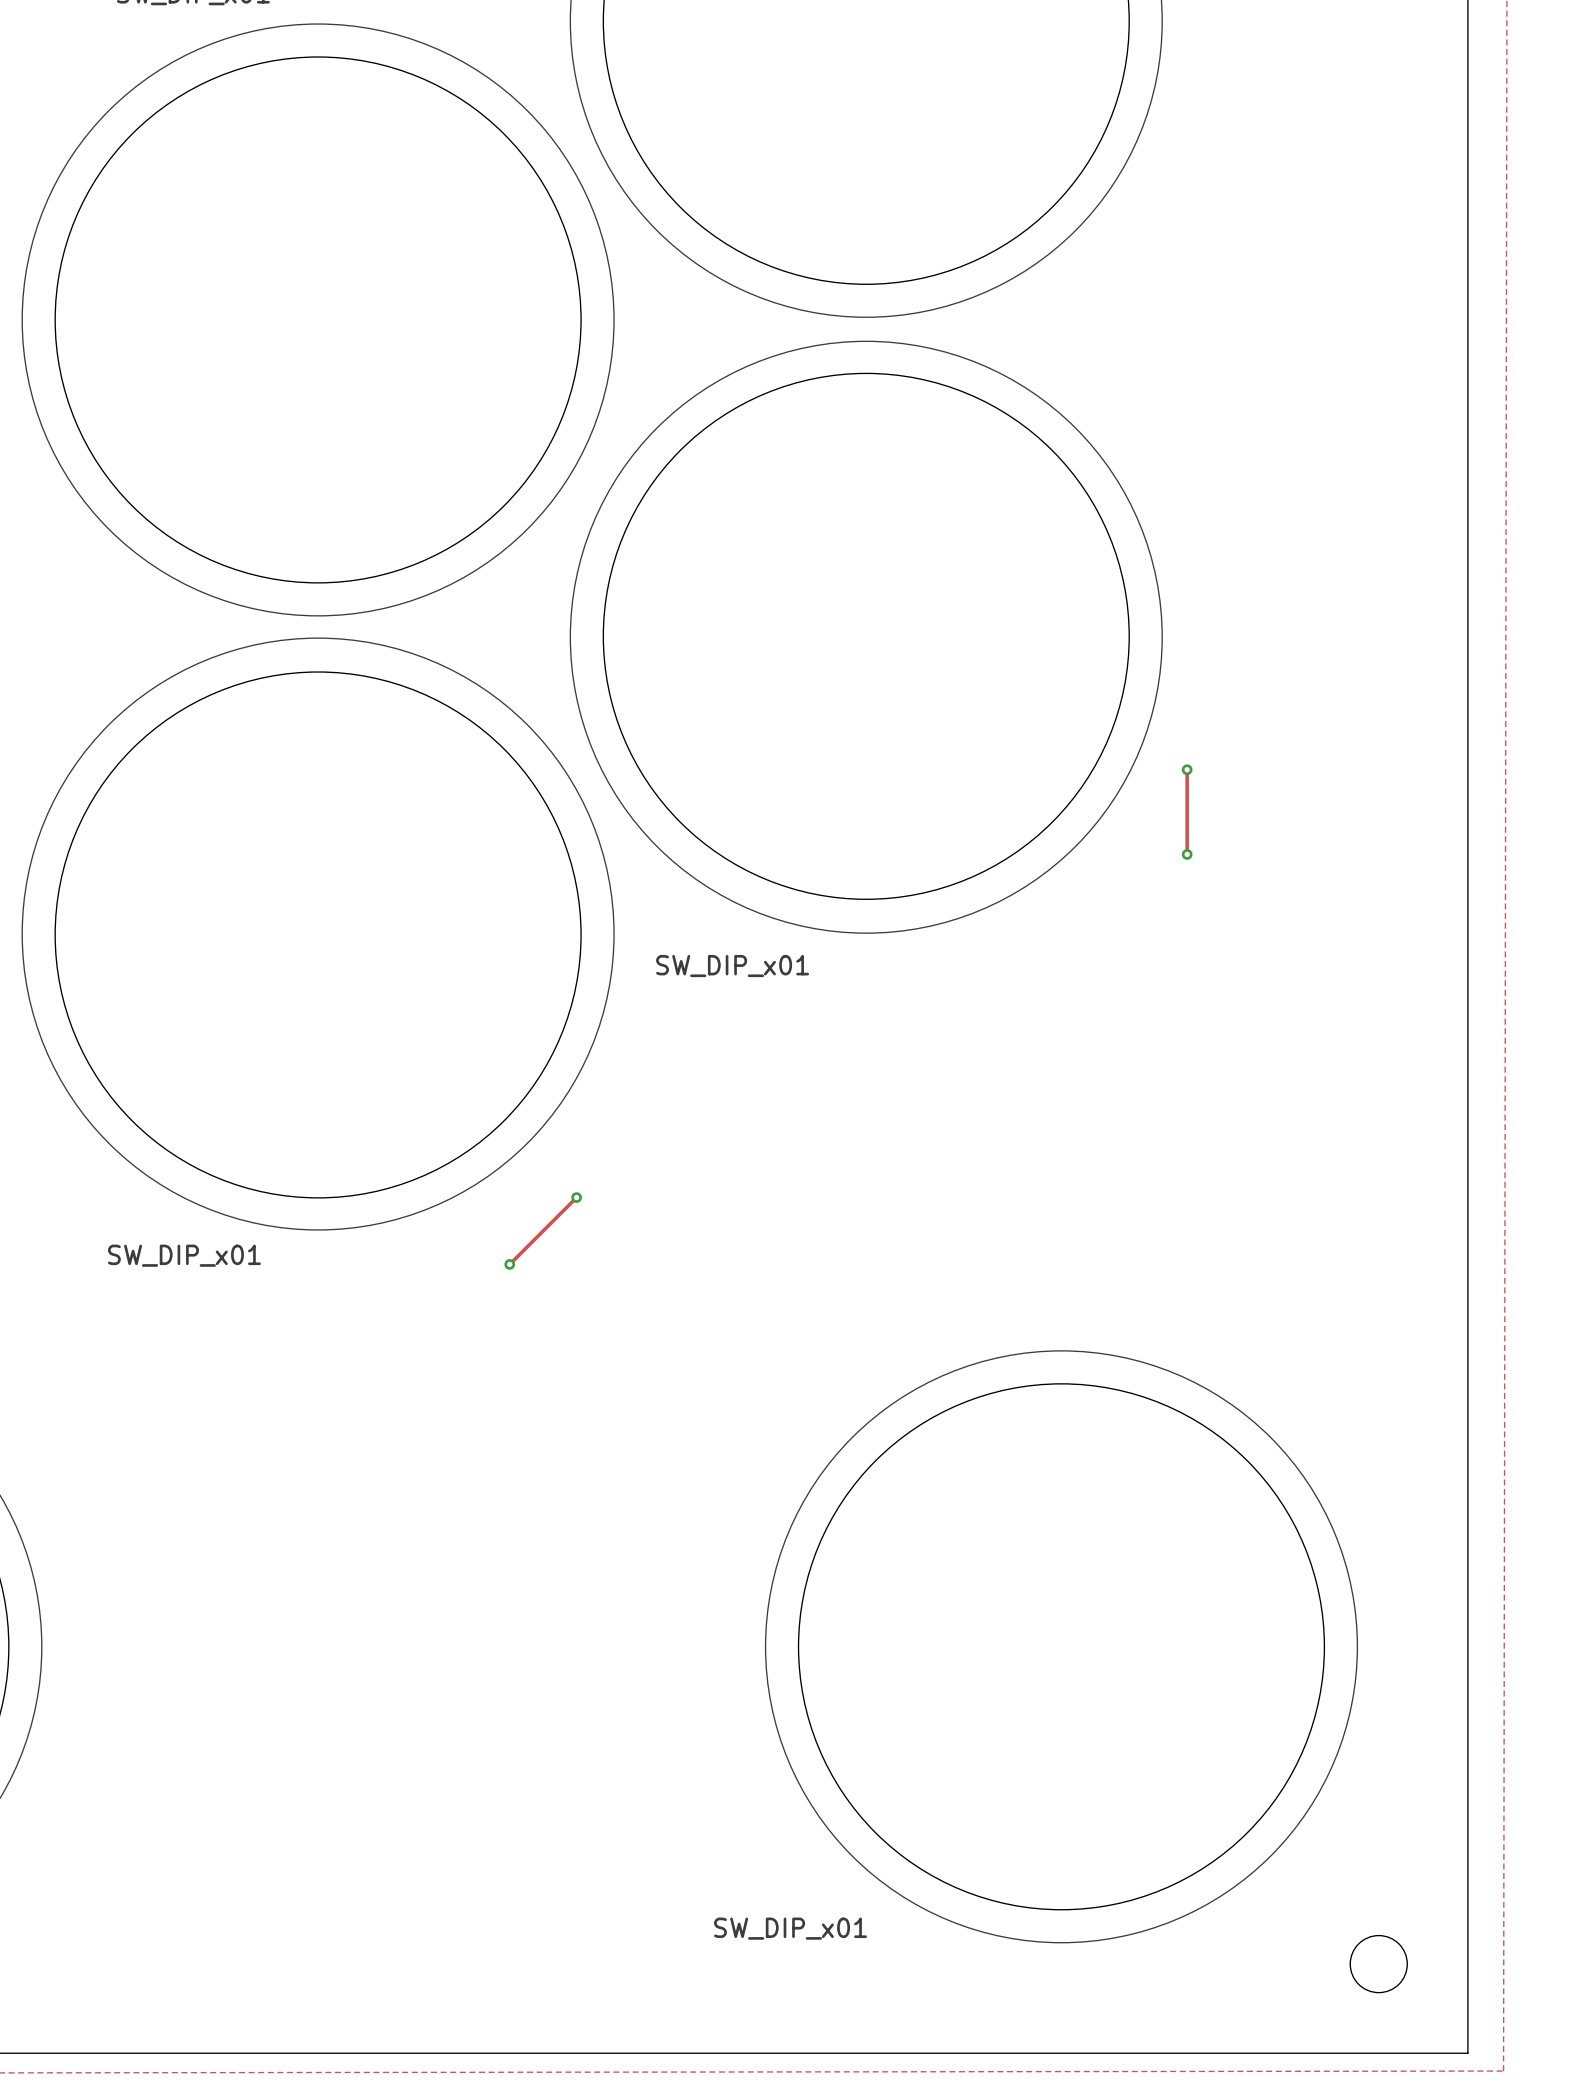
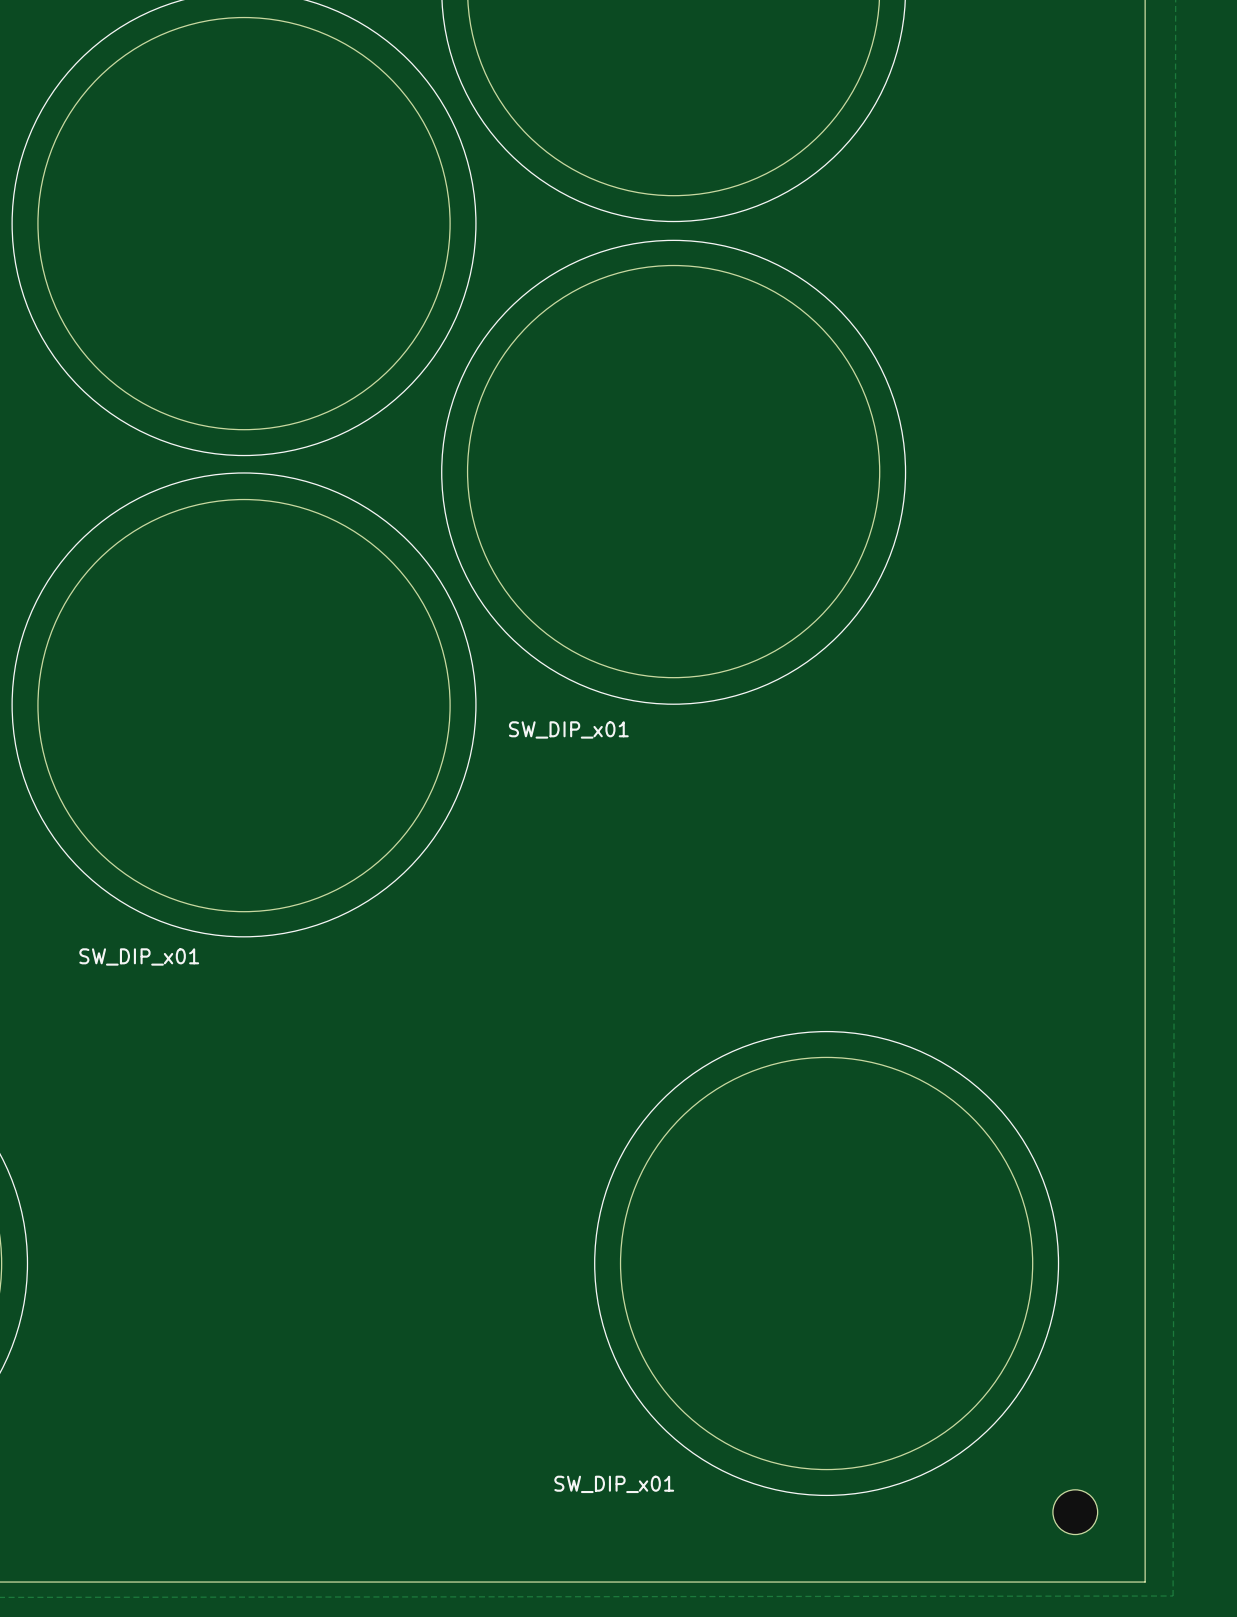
track: (1187, 769) (1187, 854) -> none
via: (1187, 769) -> none
via: (1187, 854) -> none
track: (576, 1197) (509, 1264) -> none
via: (576, 1197) -> none
via: (509, 1264) -> none

